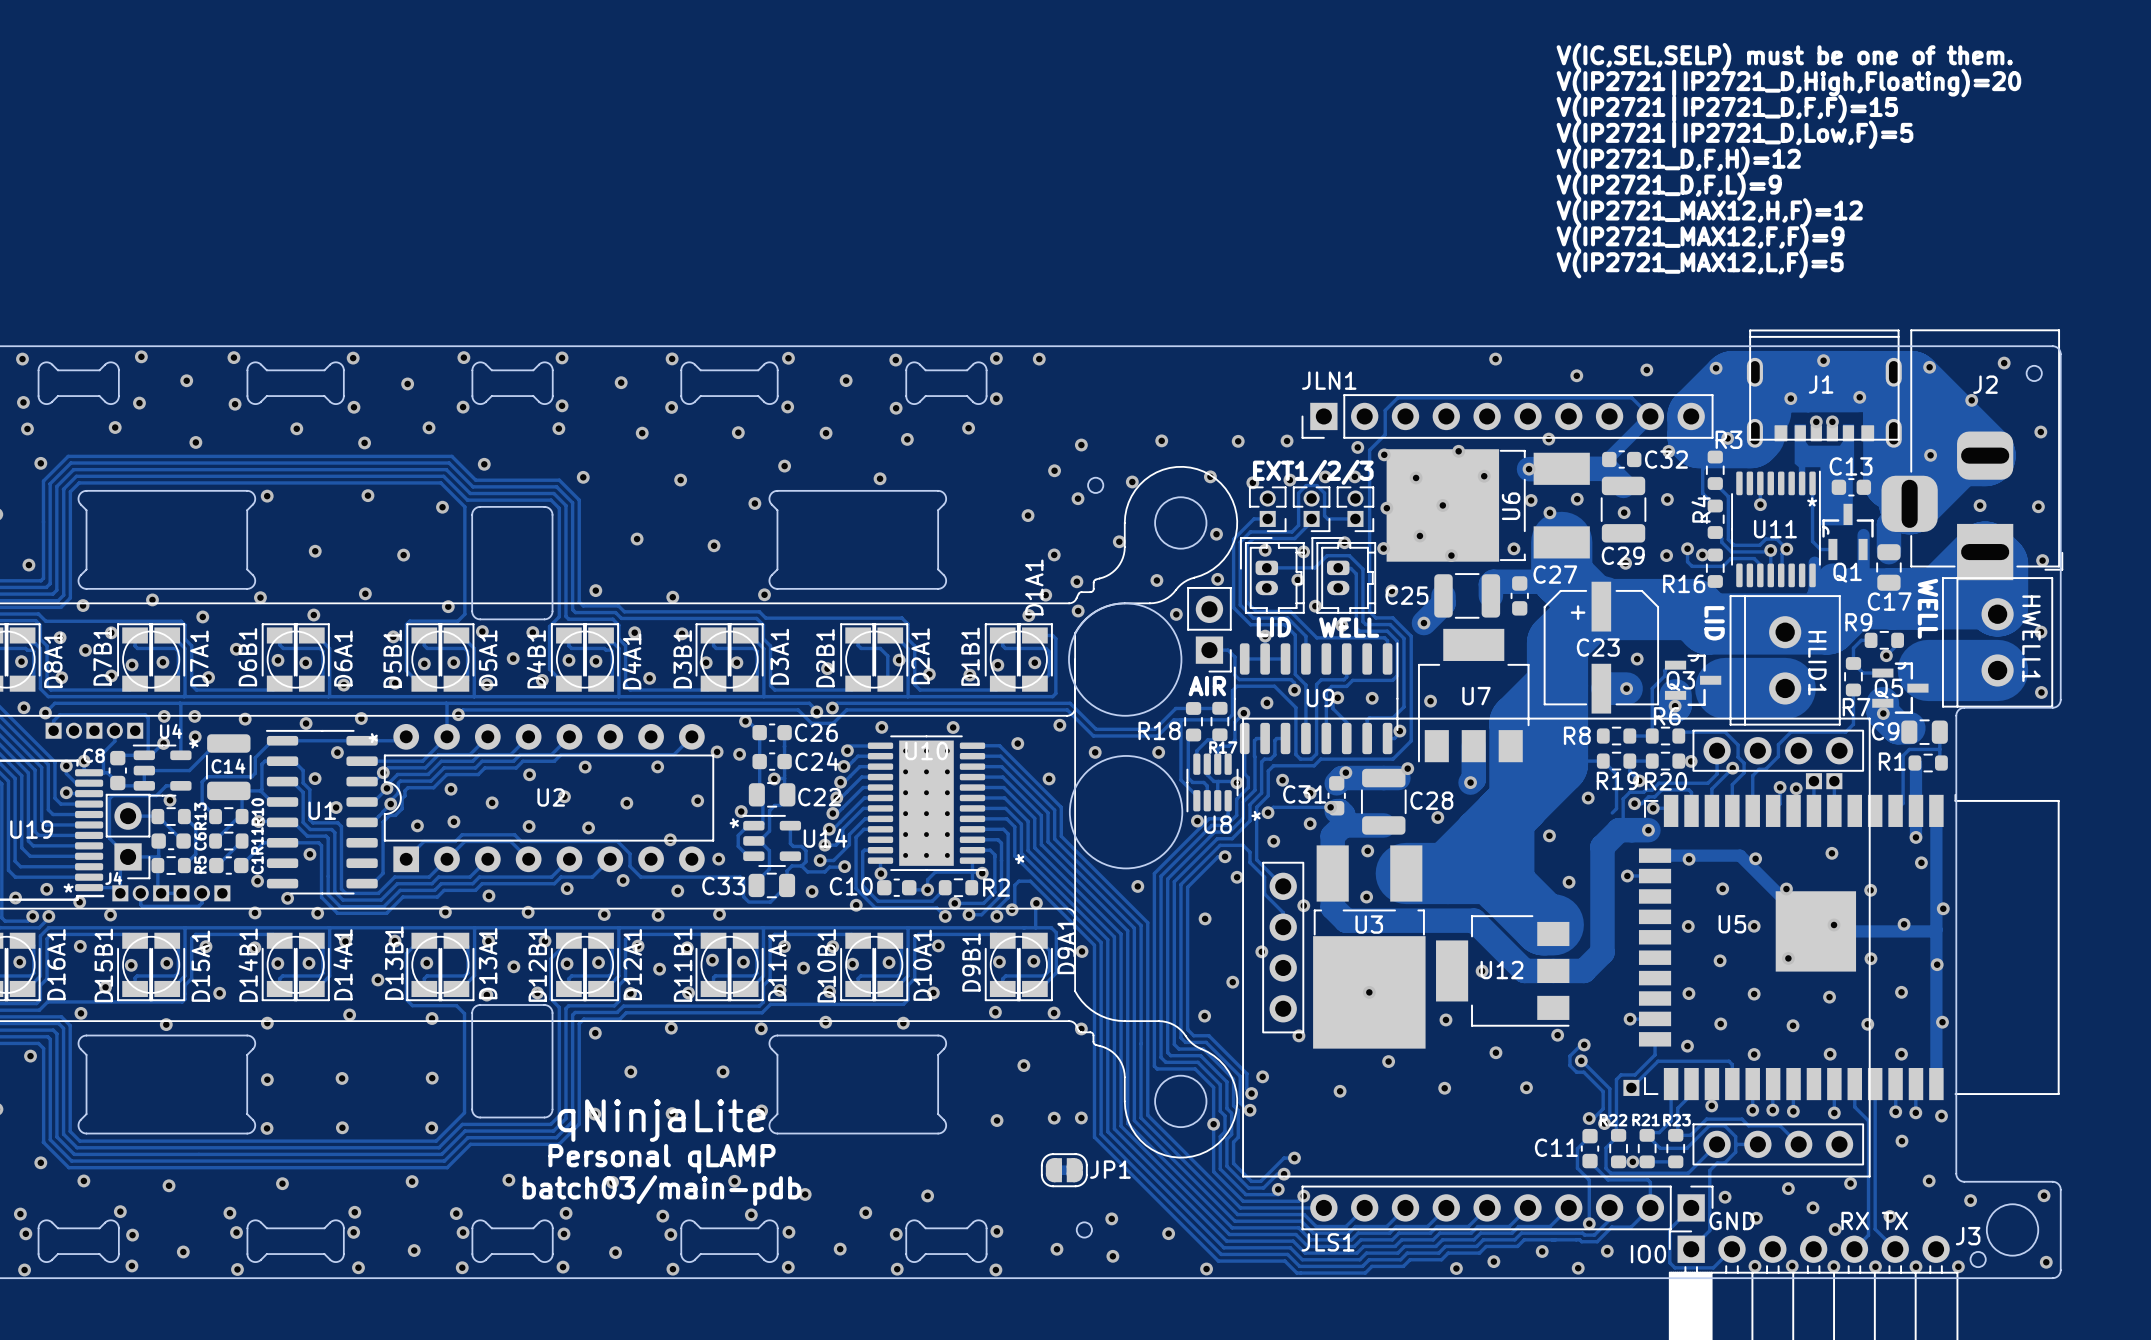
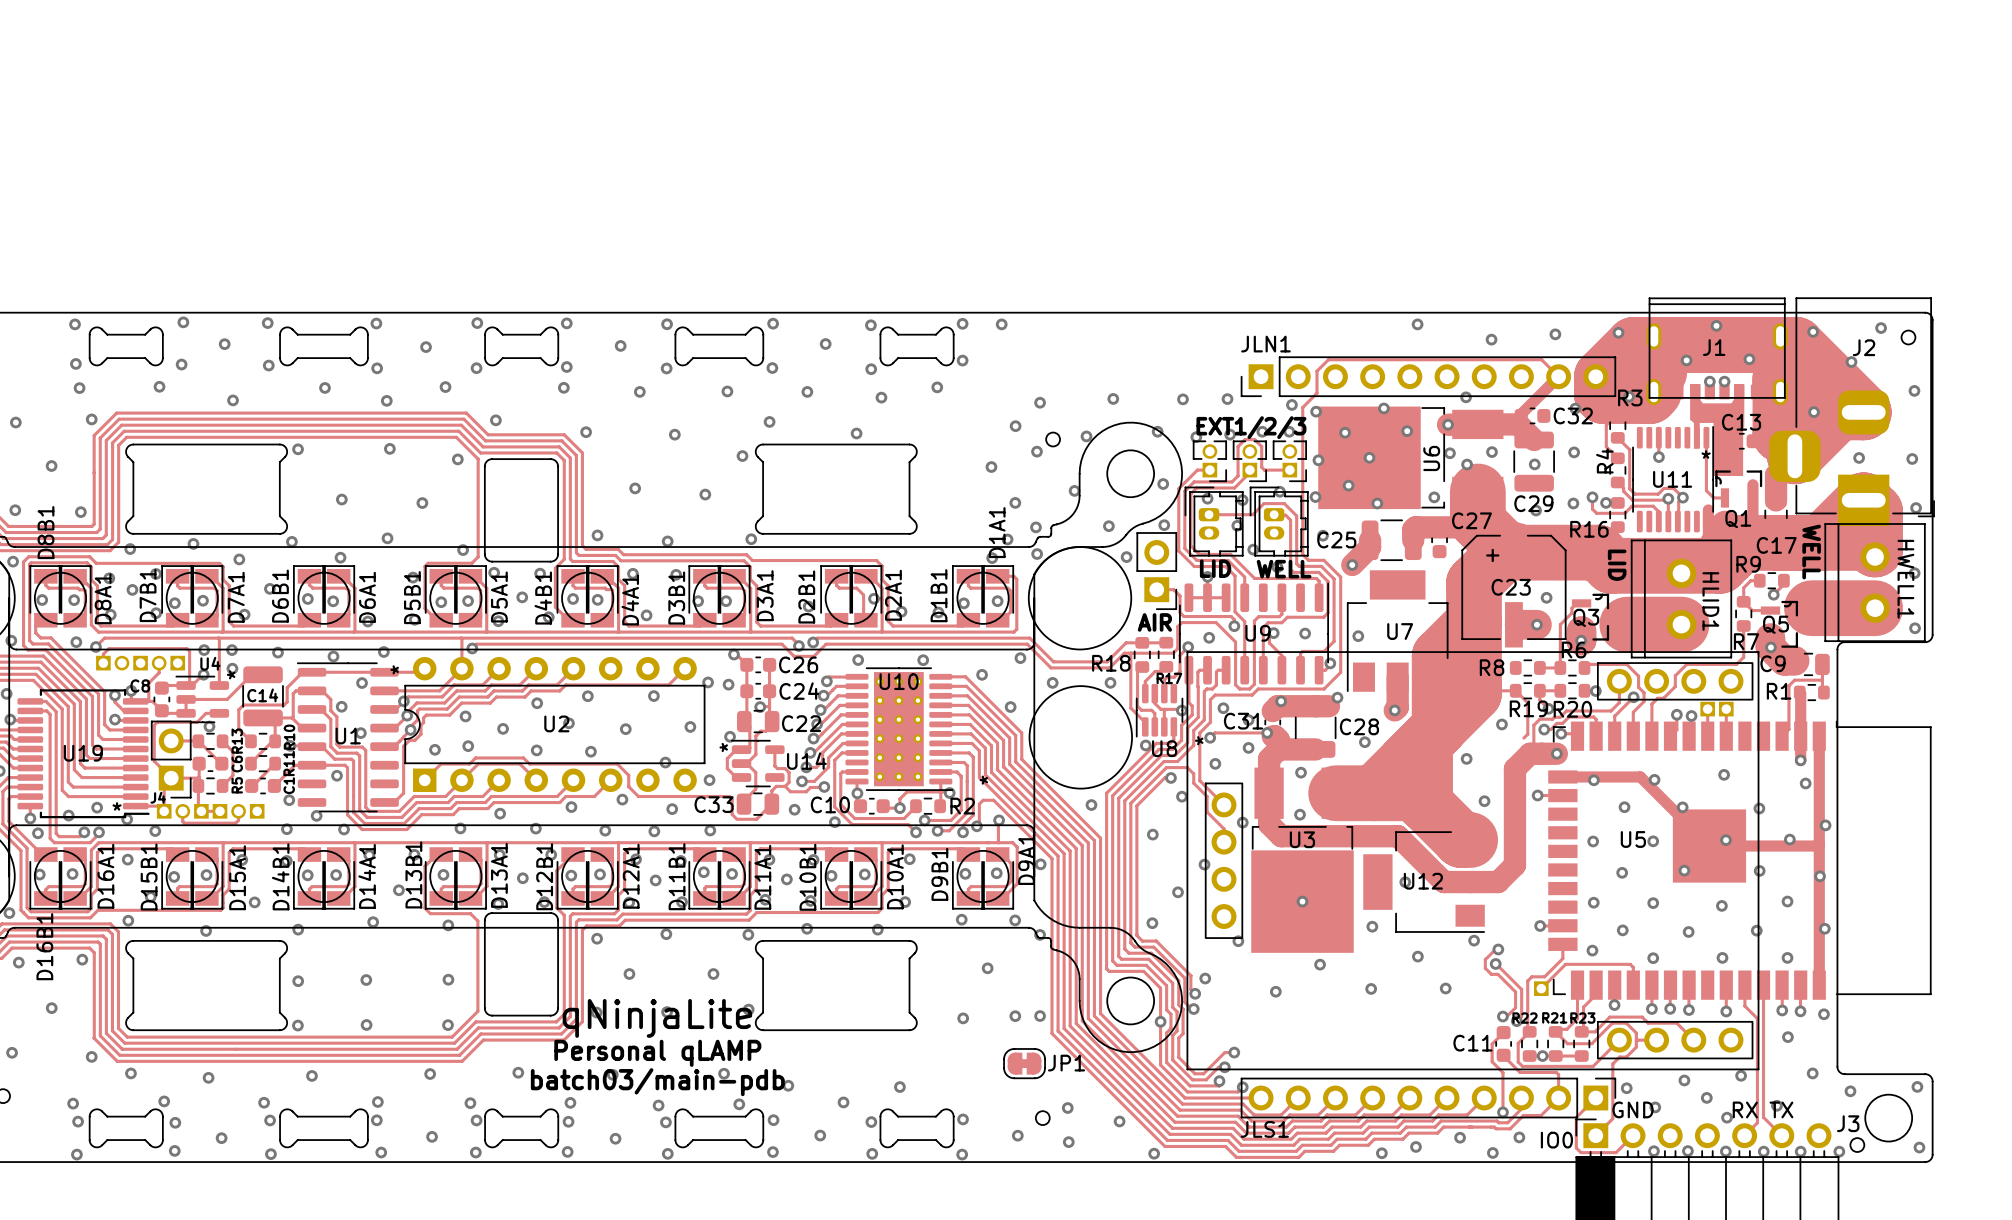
text: V(IC,SEL,SELP) must be one of them. (1784, 57) -> none
text: V(IP2721|IP2721_D,High,Floating)=20 (1788, 83) -> none
text: V(IP2721|IP2721_D,F,F)=15 (1727, 108) -> none
text: V(IP2721|IP2721_D,Low,F)=5 (1734, 134) -> none
text: V(IP2721_D,F,H)=12 (1678, 160) -> none
text: V(IP2721_D,F,L)=9 (1669, 186) -> none
text: V(IP2721_MAX12,H,F)=12 (1709, 212) -> none
text: V(IP2721_MAX12,F,F)=9 (1700, 238) -> none
text: V(IP2721_MAX12,L,F)=5 (1700, 264) -> none

